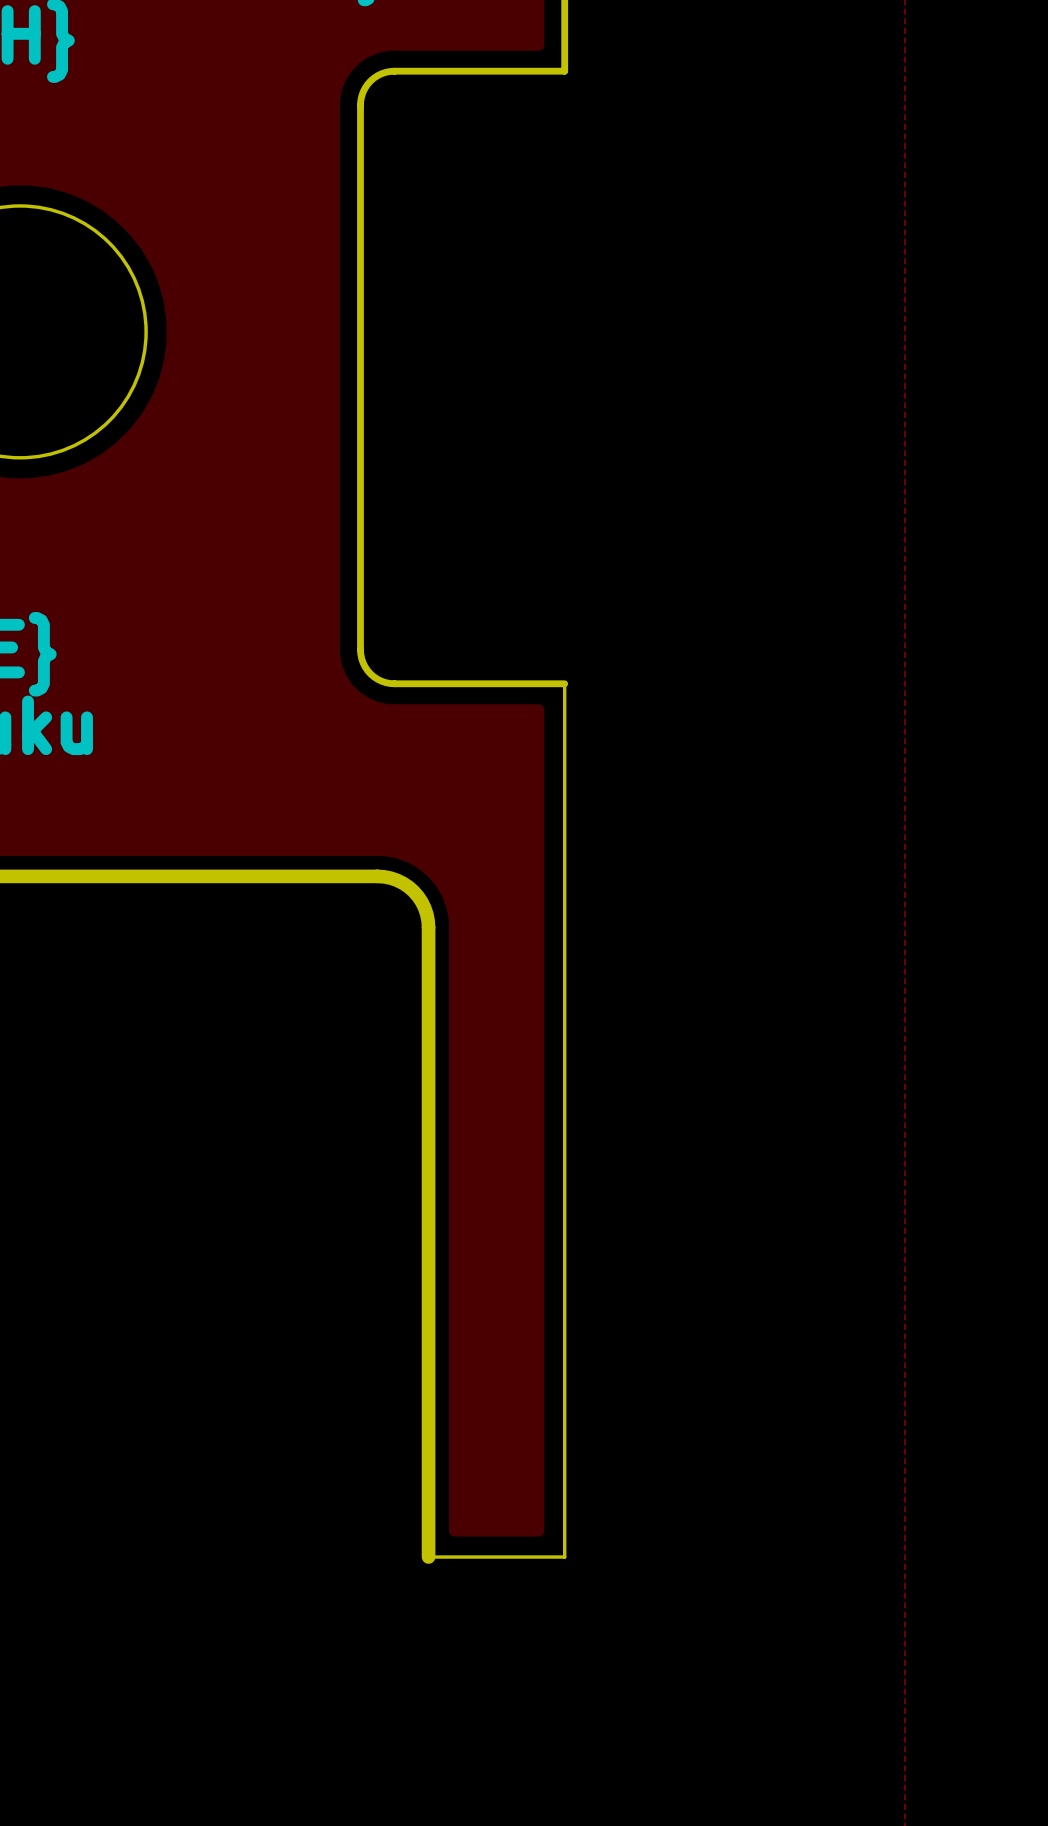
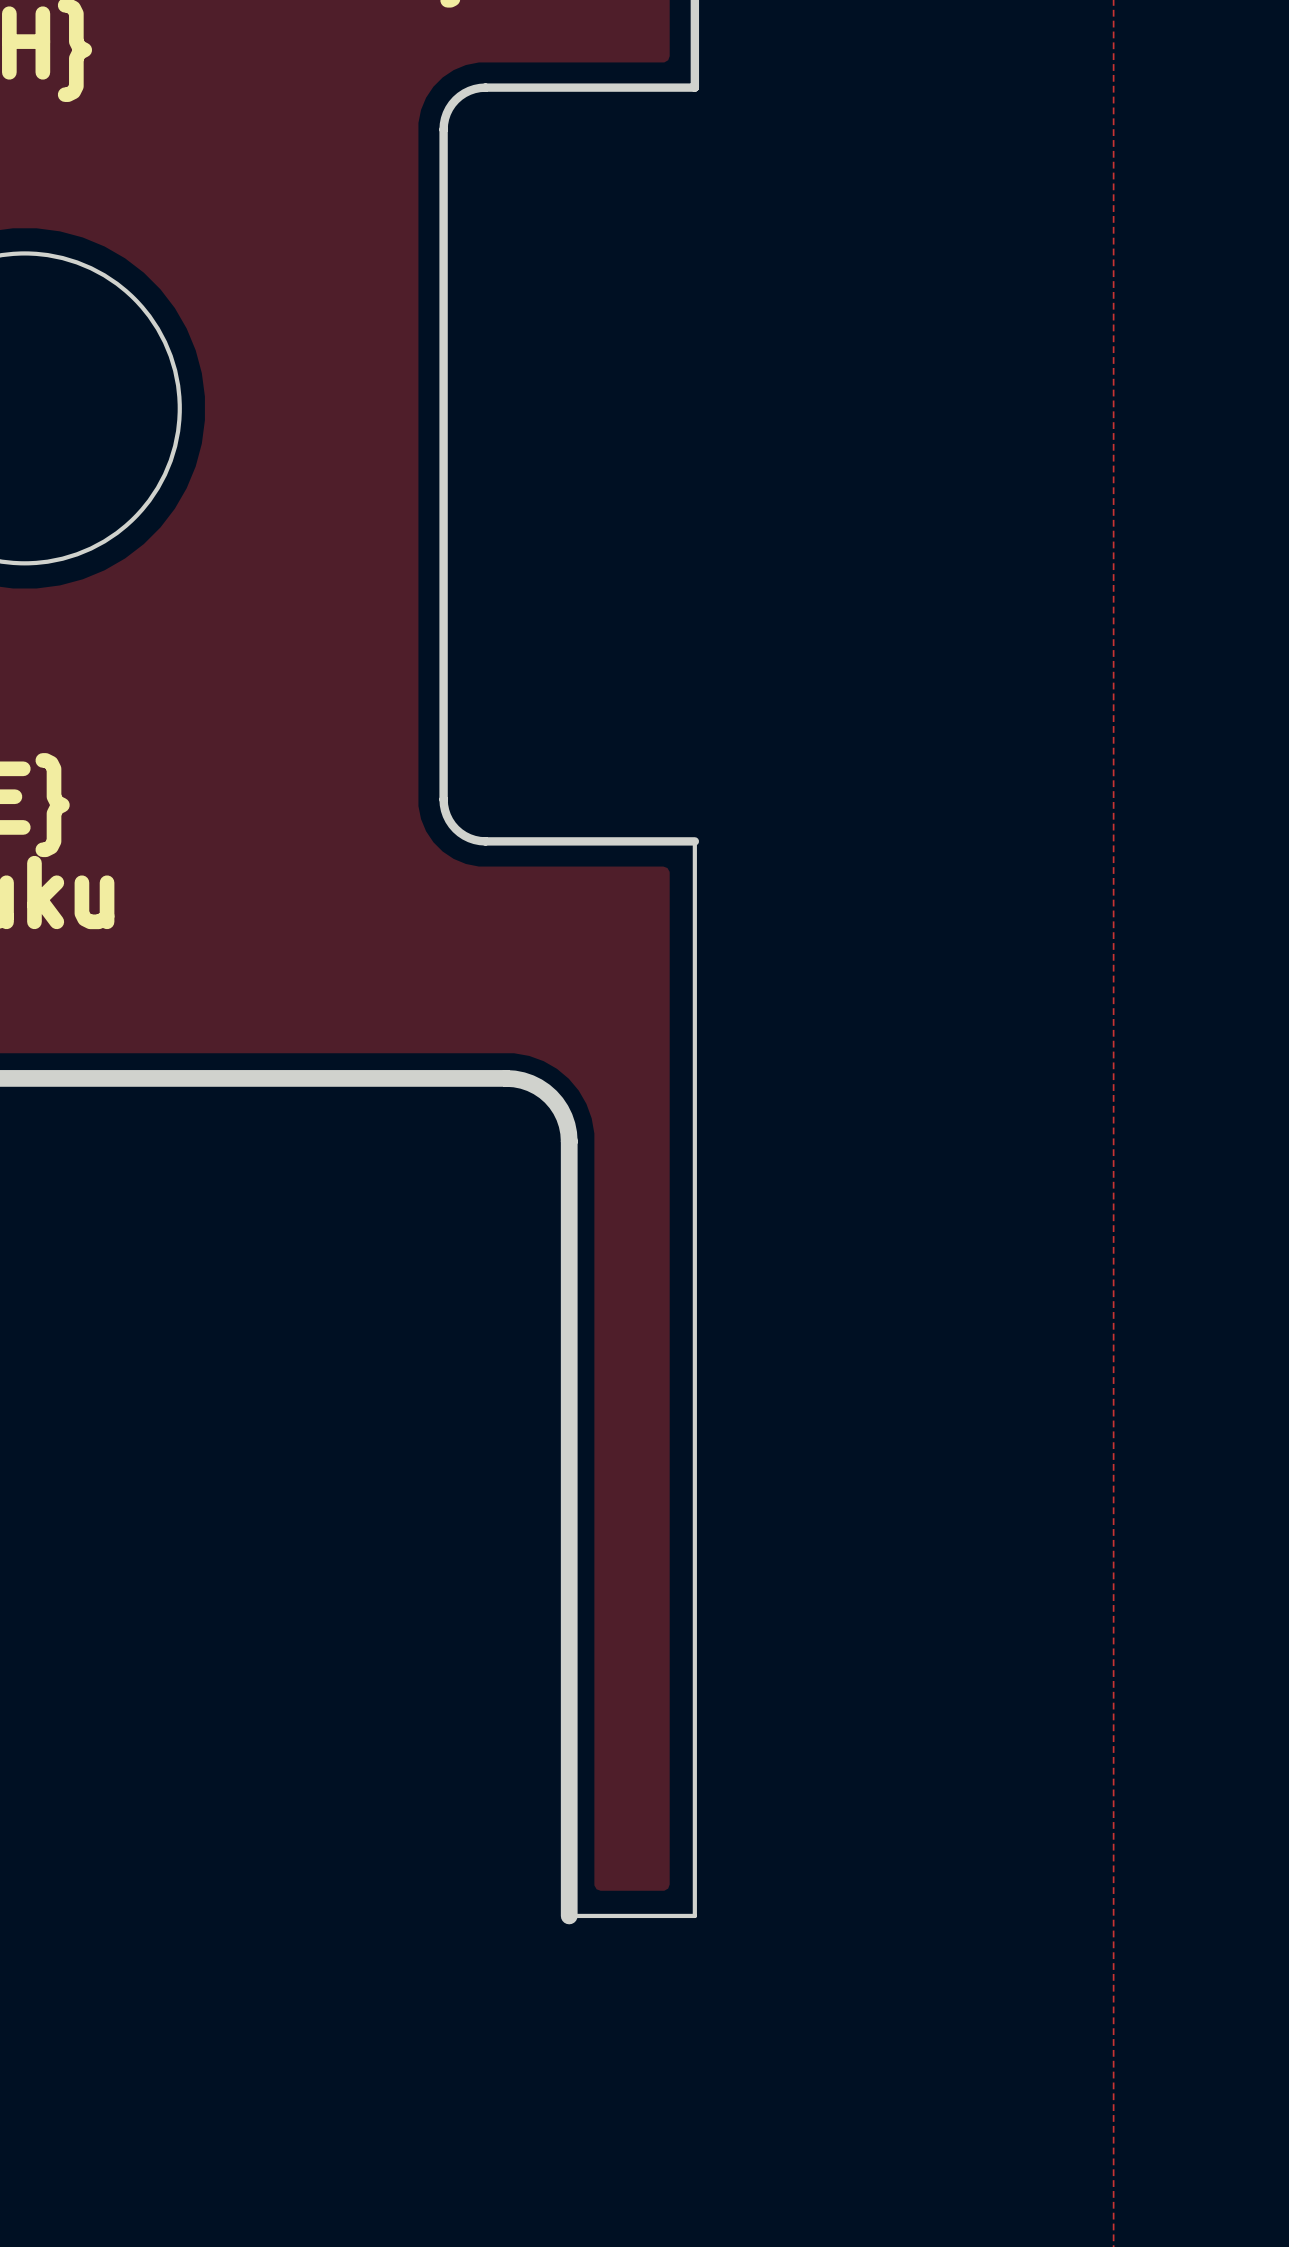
board edge: (377, 876) (397, 880) (413, 891) (424, 907) (428, 920) (428, 1557) (462, 1557) -> (464, 1078) (514, 1078) (537, 1086) (556, 1102) (564, 1117) (568, 1133) (569, 1915)

